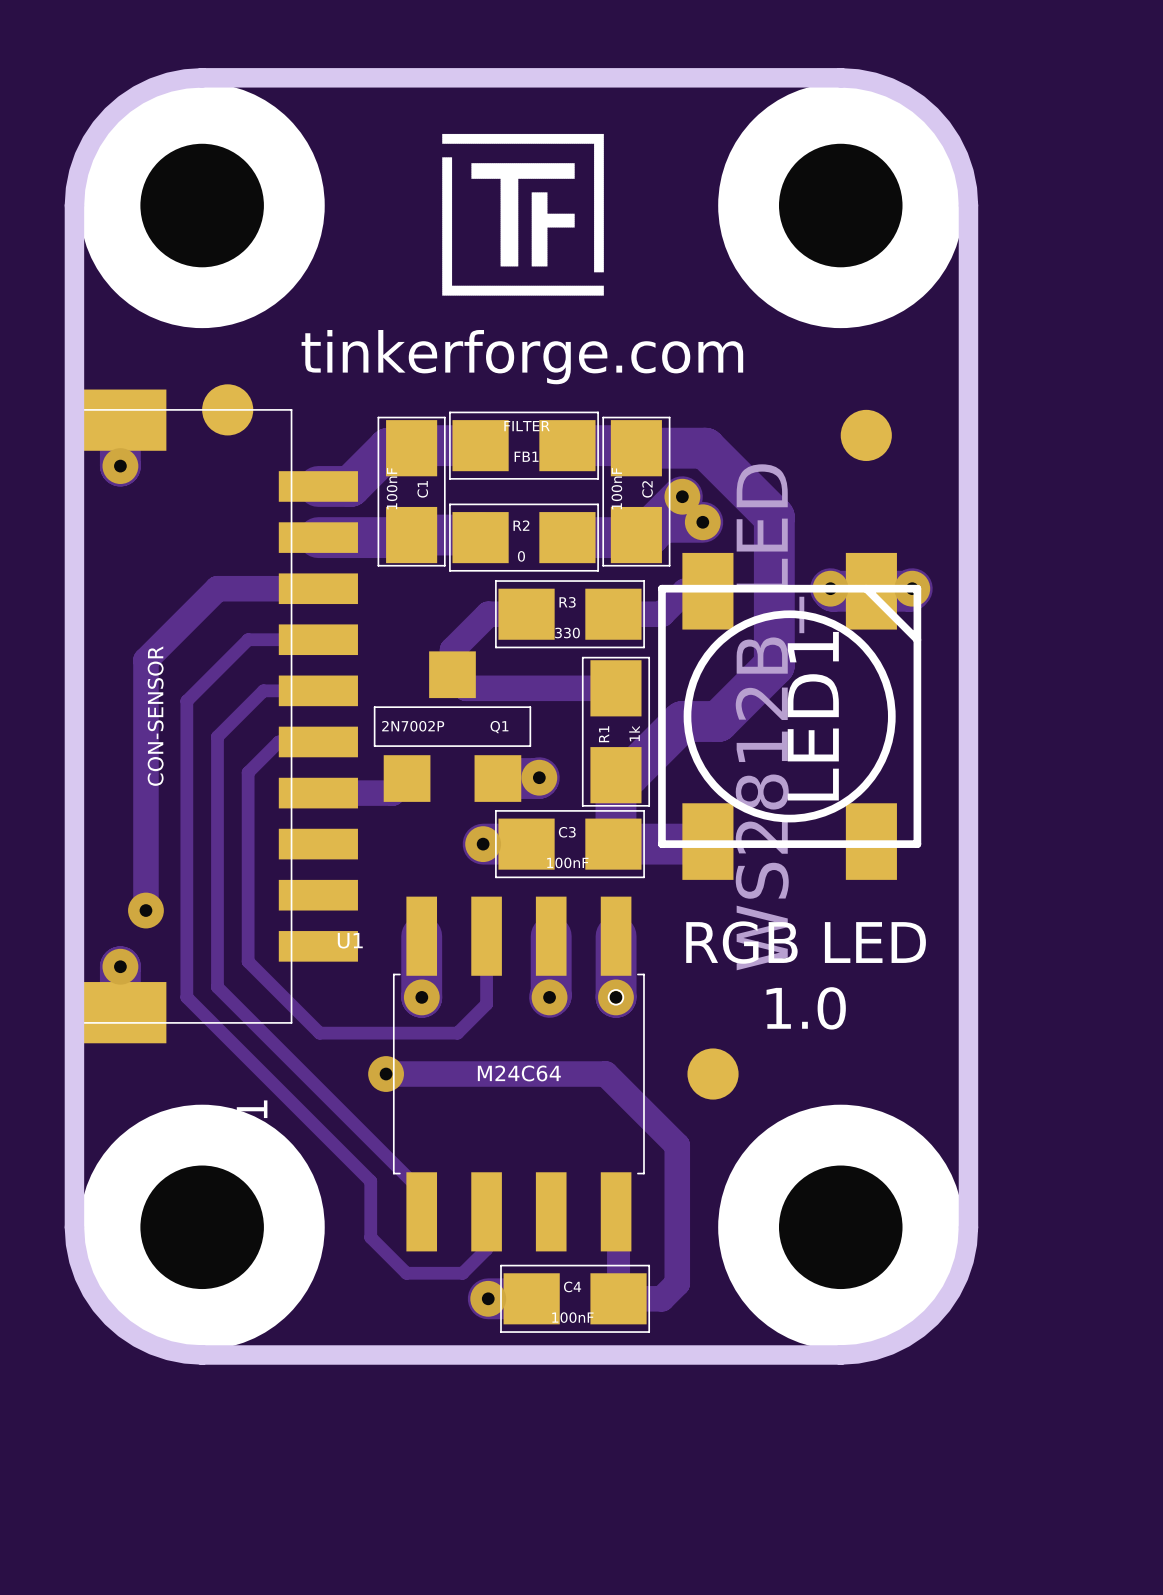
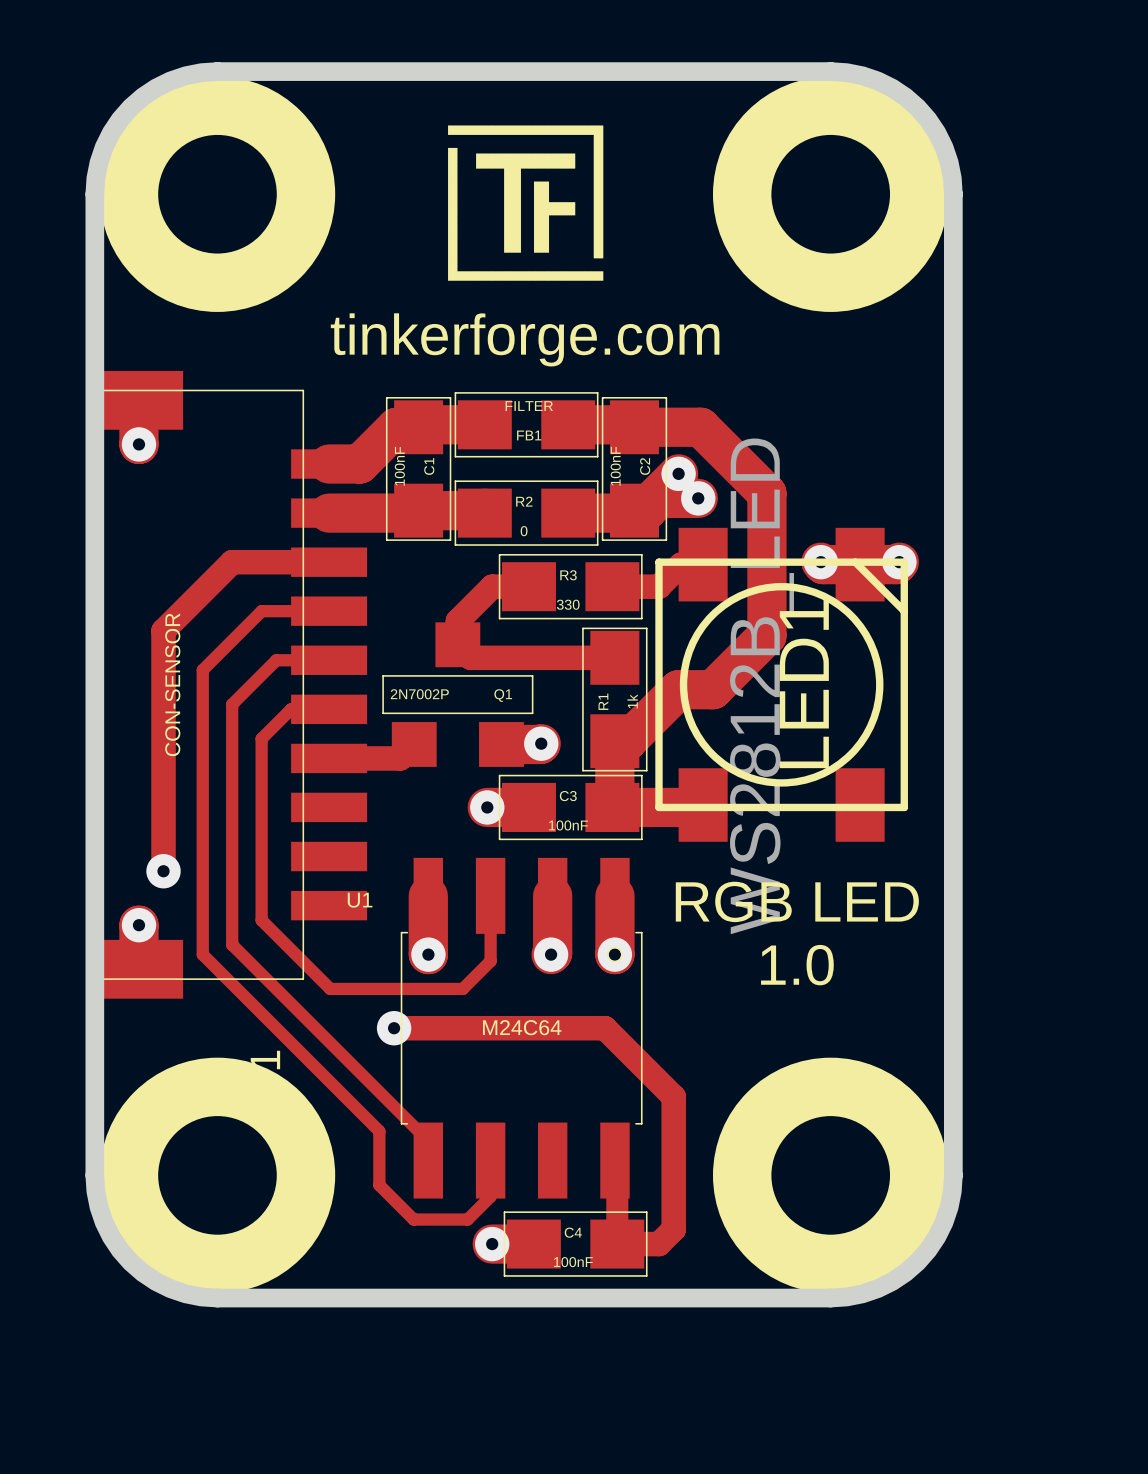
part: (227, 409) -> none
part: (866, 435) -> none
part: (713, 1074) -> none

